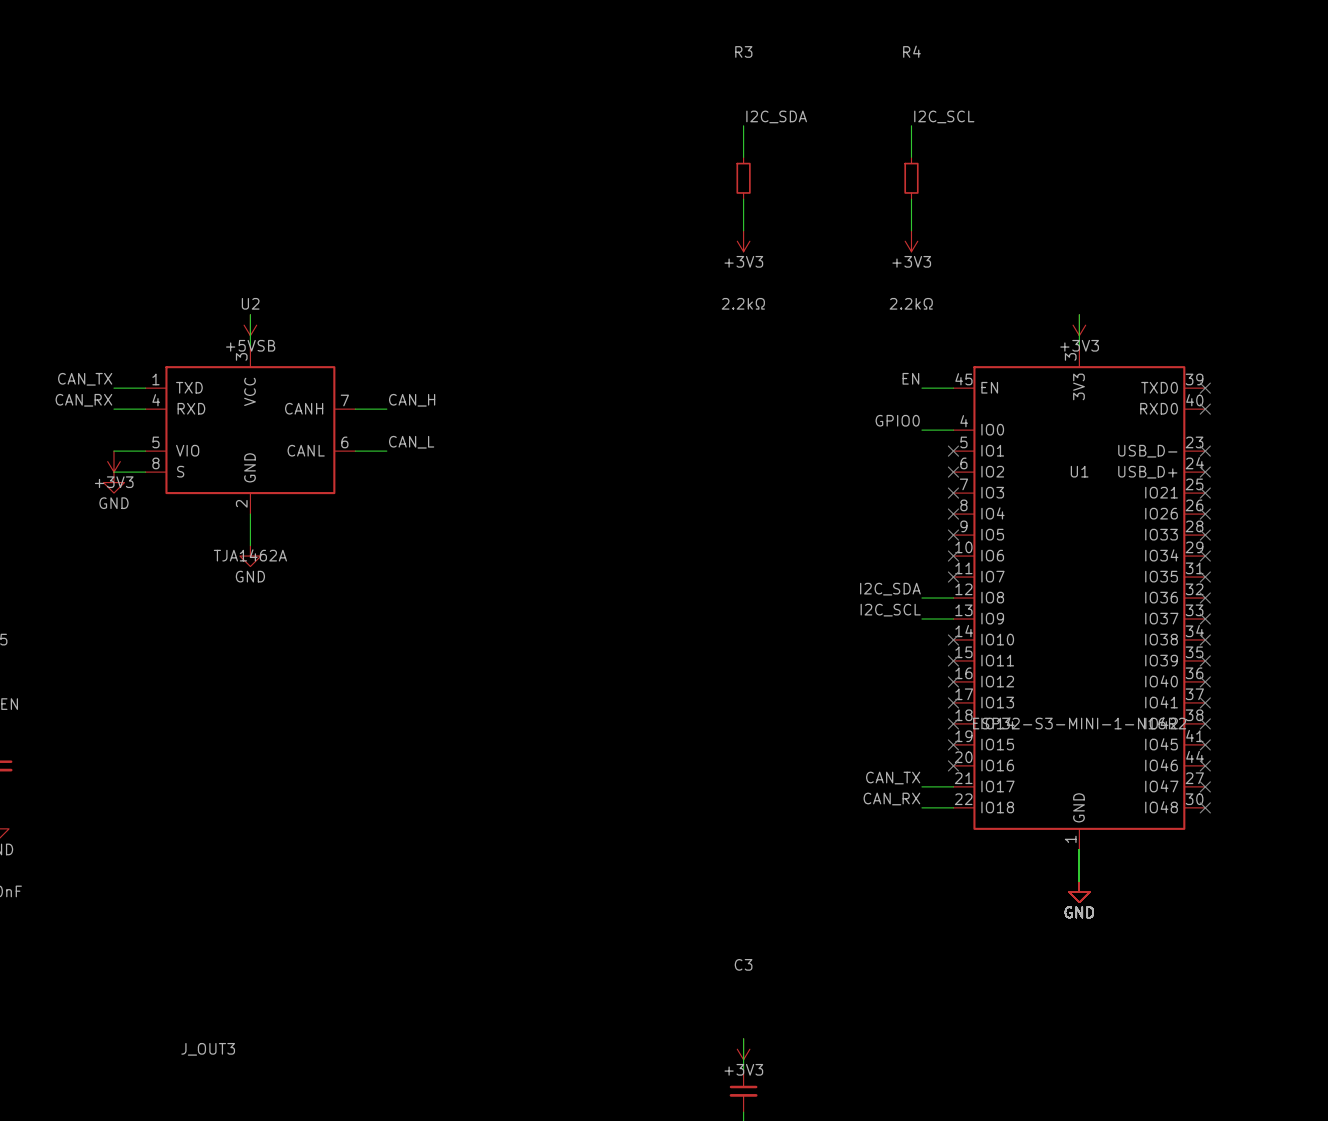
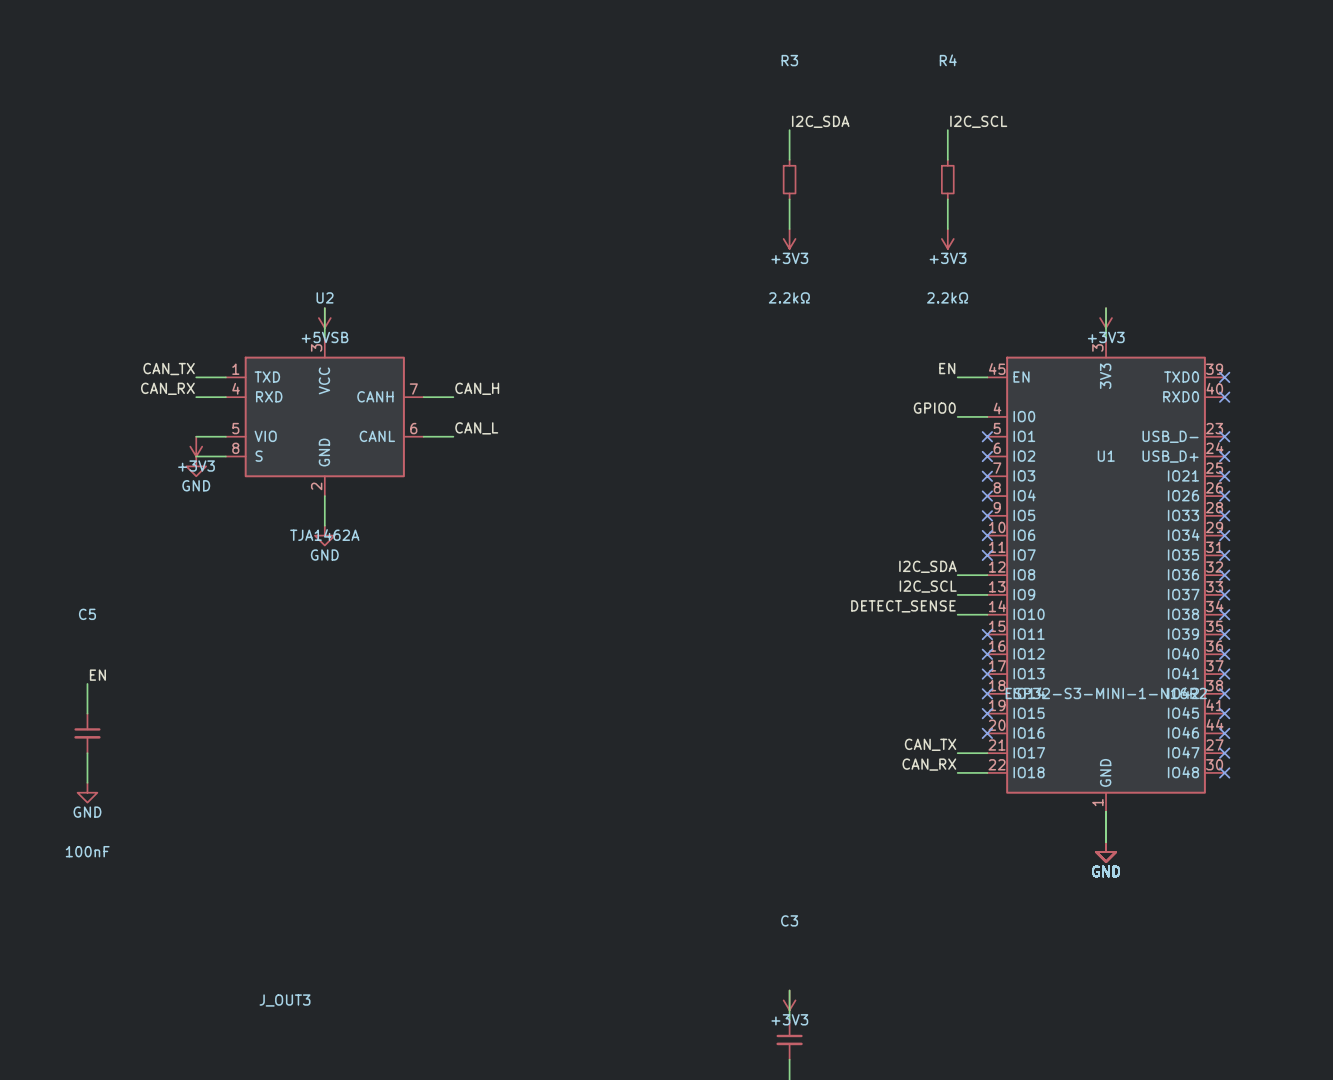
label: none -> DETECT_SENSE (903, 606)
wire: none -> (957, 614) (987, 614)
no-connect mark: (953, 639) -> none

